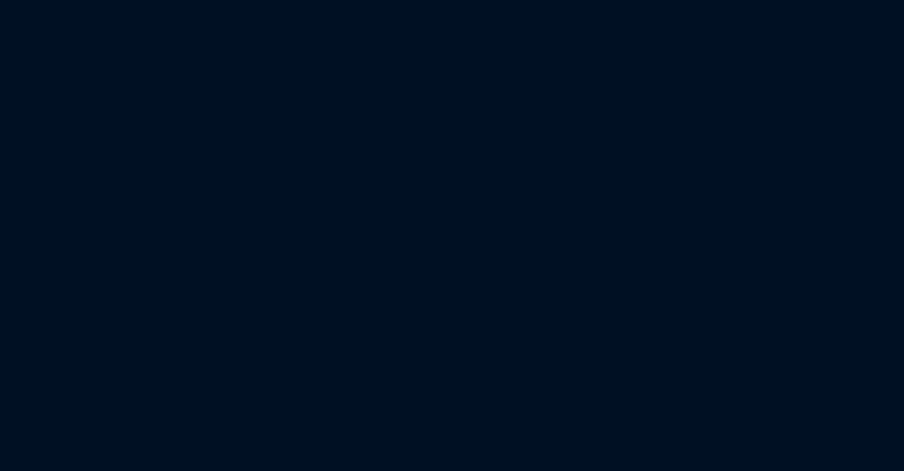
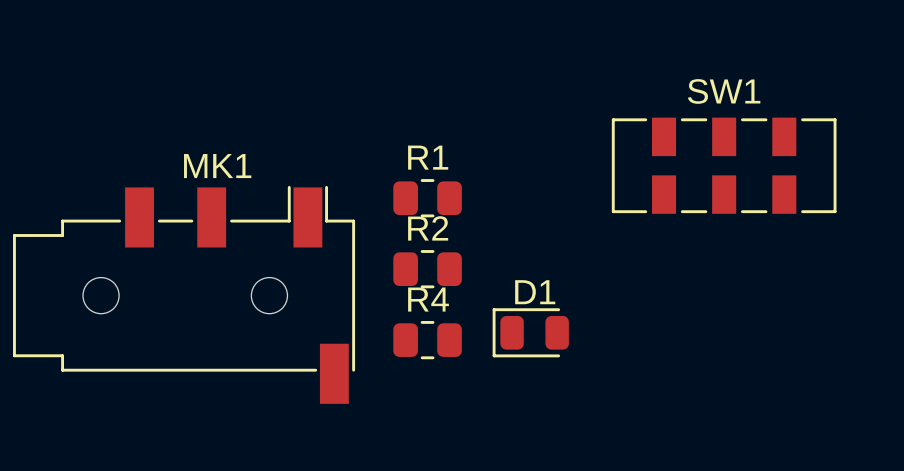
SW1: none -> (724, 165)
R1: none -> (427, 198)
R2: none -> (427, 269)
MK1: none -> (184, 294)
D1: none -> (530, 332)
R4: none -> (427, 340)

